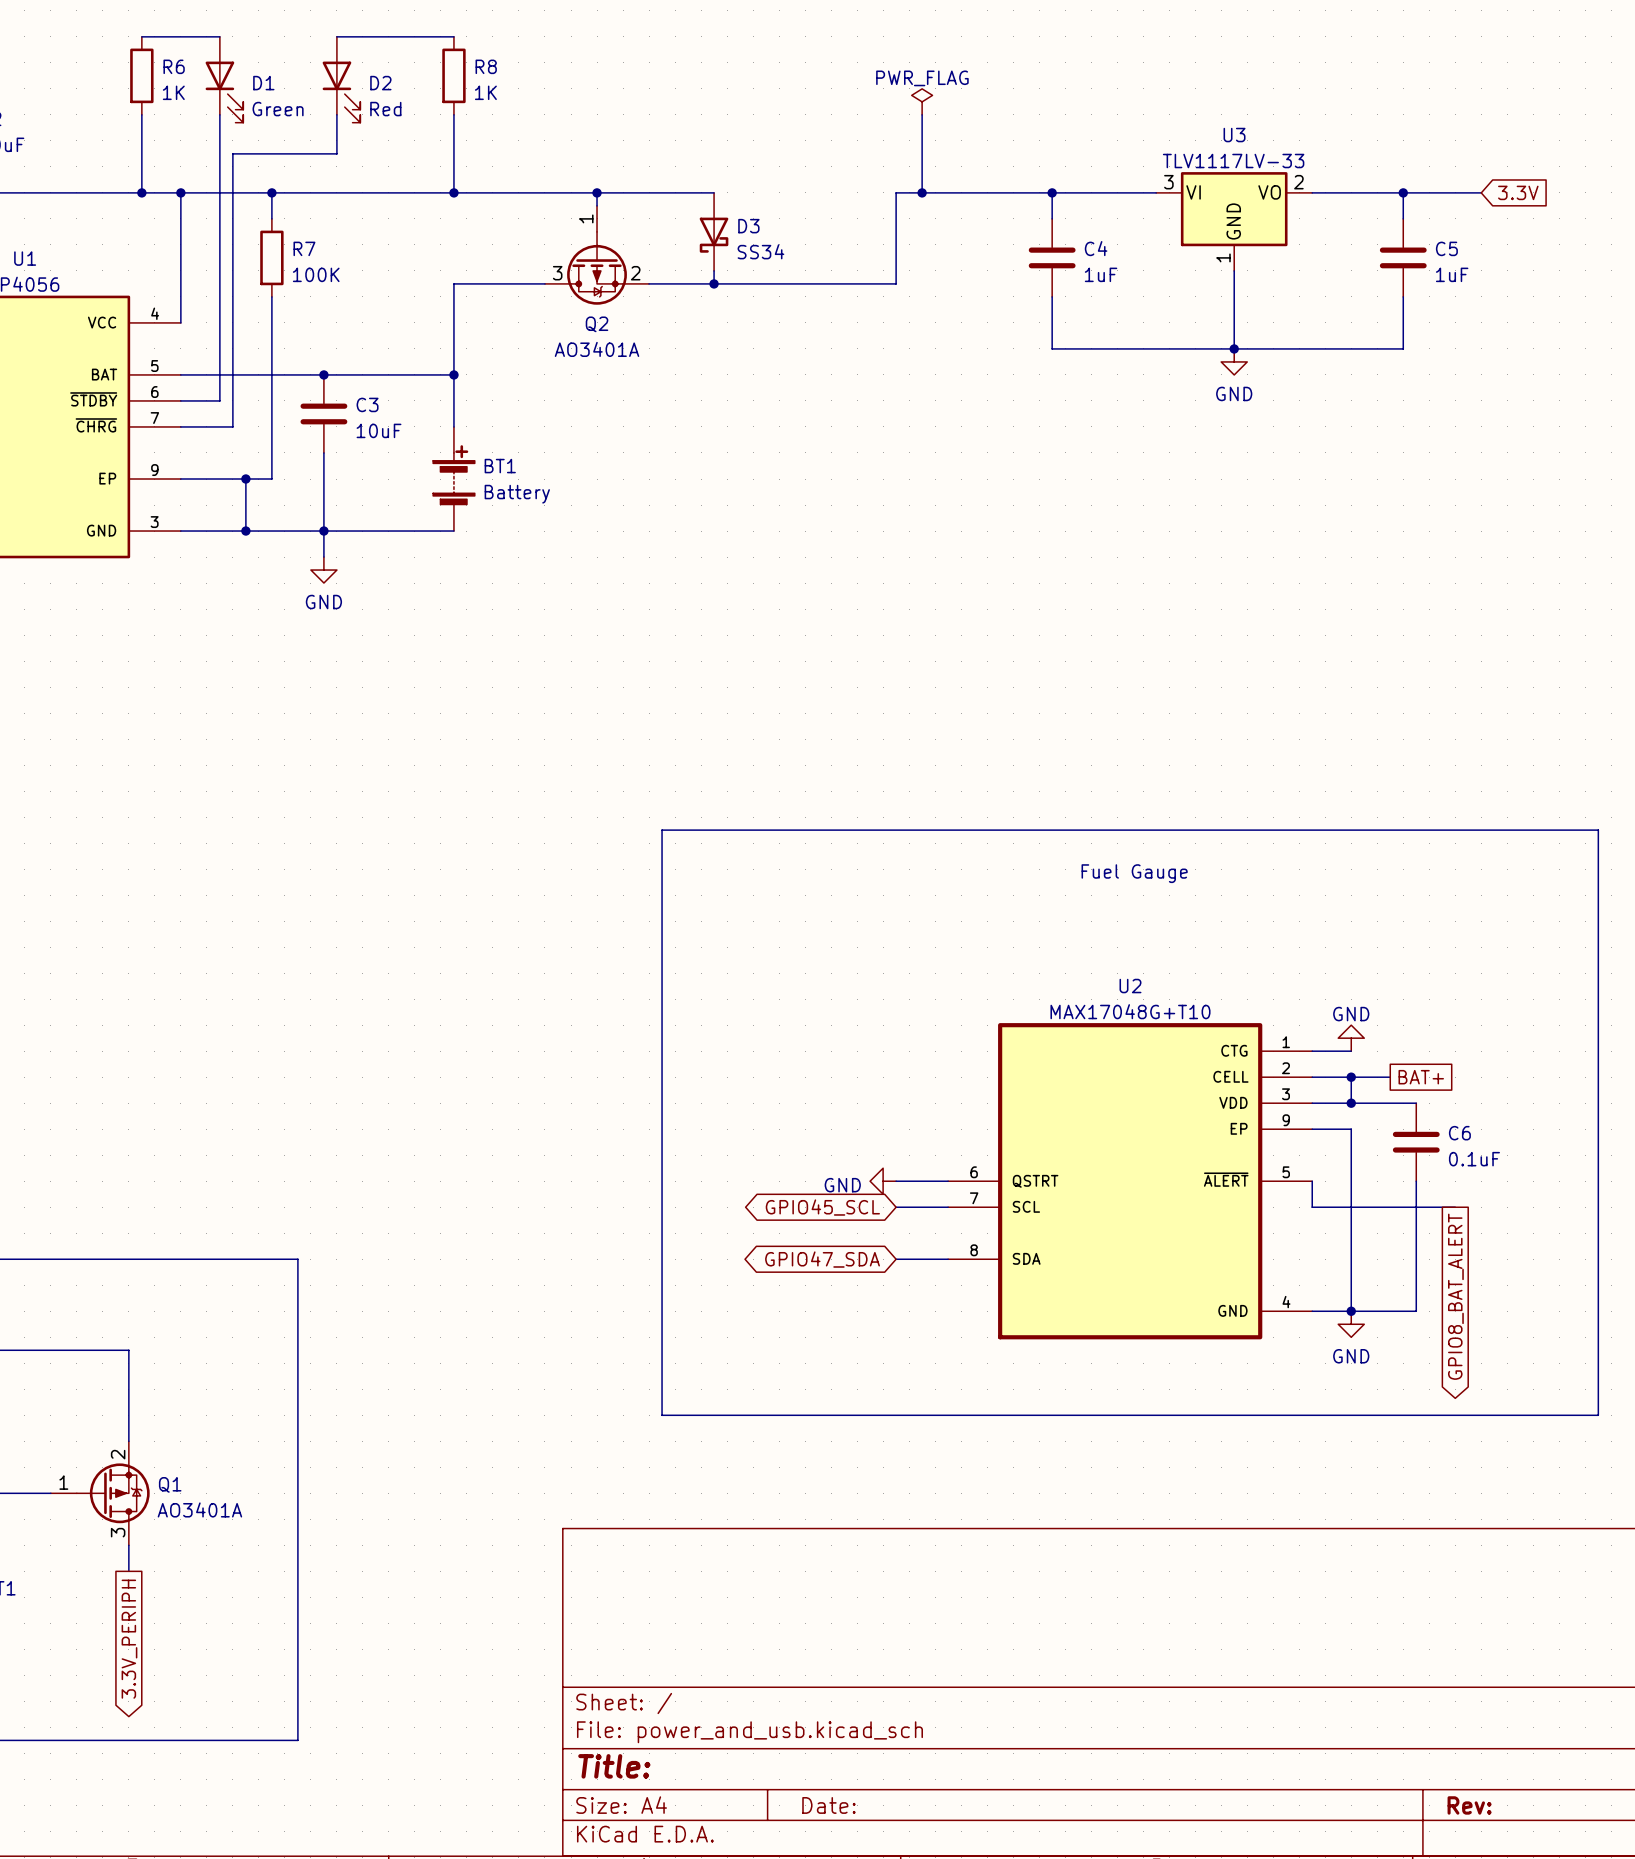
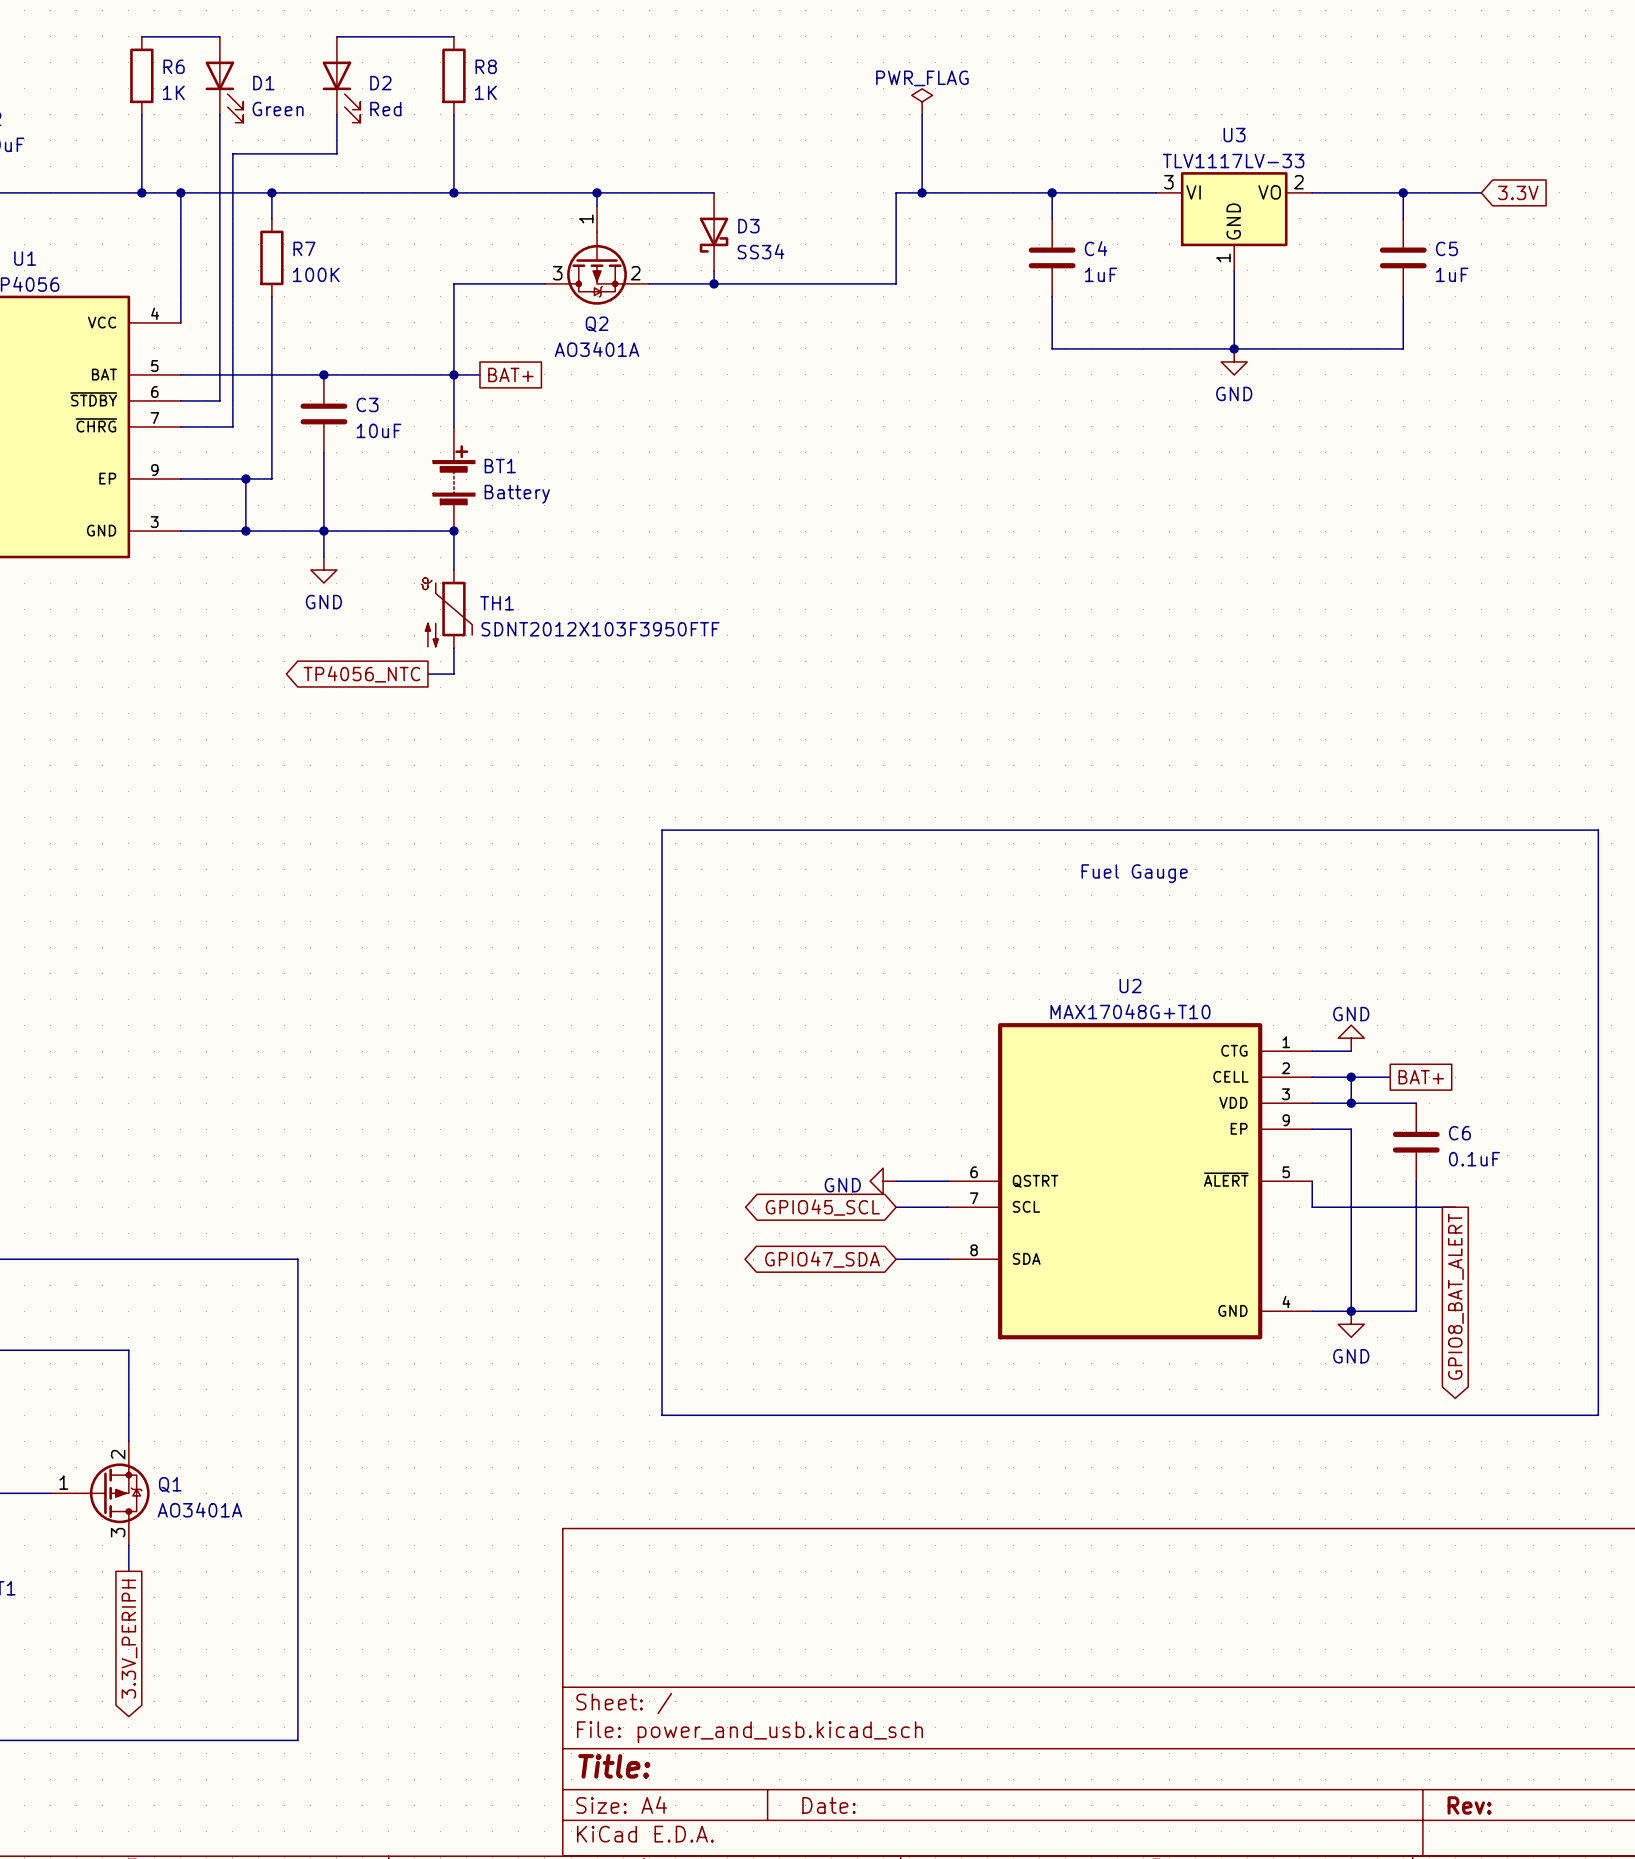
wire: none -> (453, 374) (479, 374)
global label: none -> BAT+ (510, 374)
wire: none -> (453, 531) (453, 570)
junction: none -> (453, 531)
TH1: none -> SDNT2012X103F3950FTF (446, 609)
wire: none -> (453, 648) (453, 674) (427, 674)
global label: none -> TP4056_NTC (361, 674)

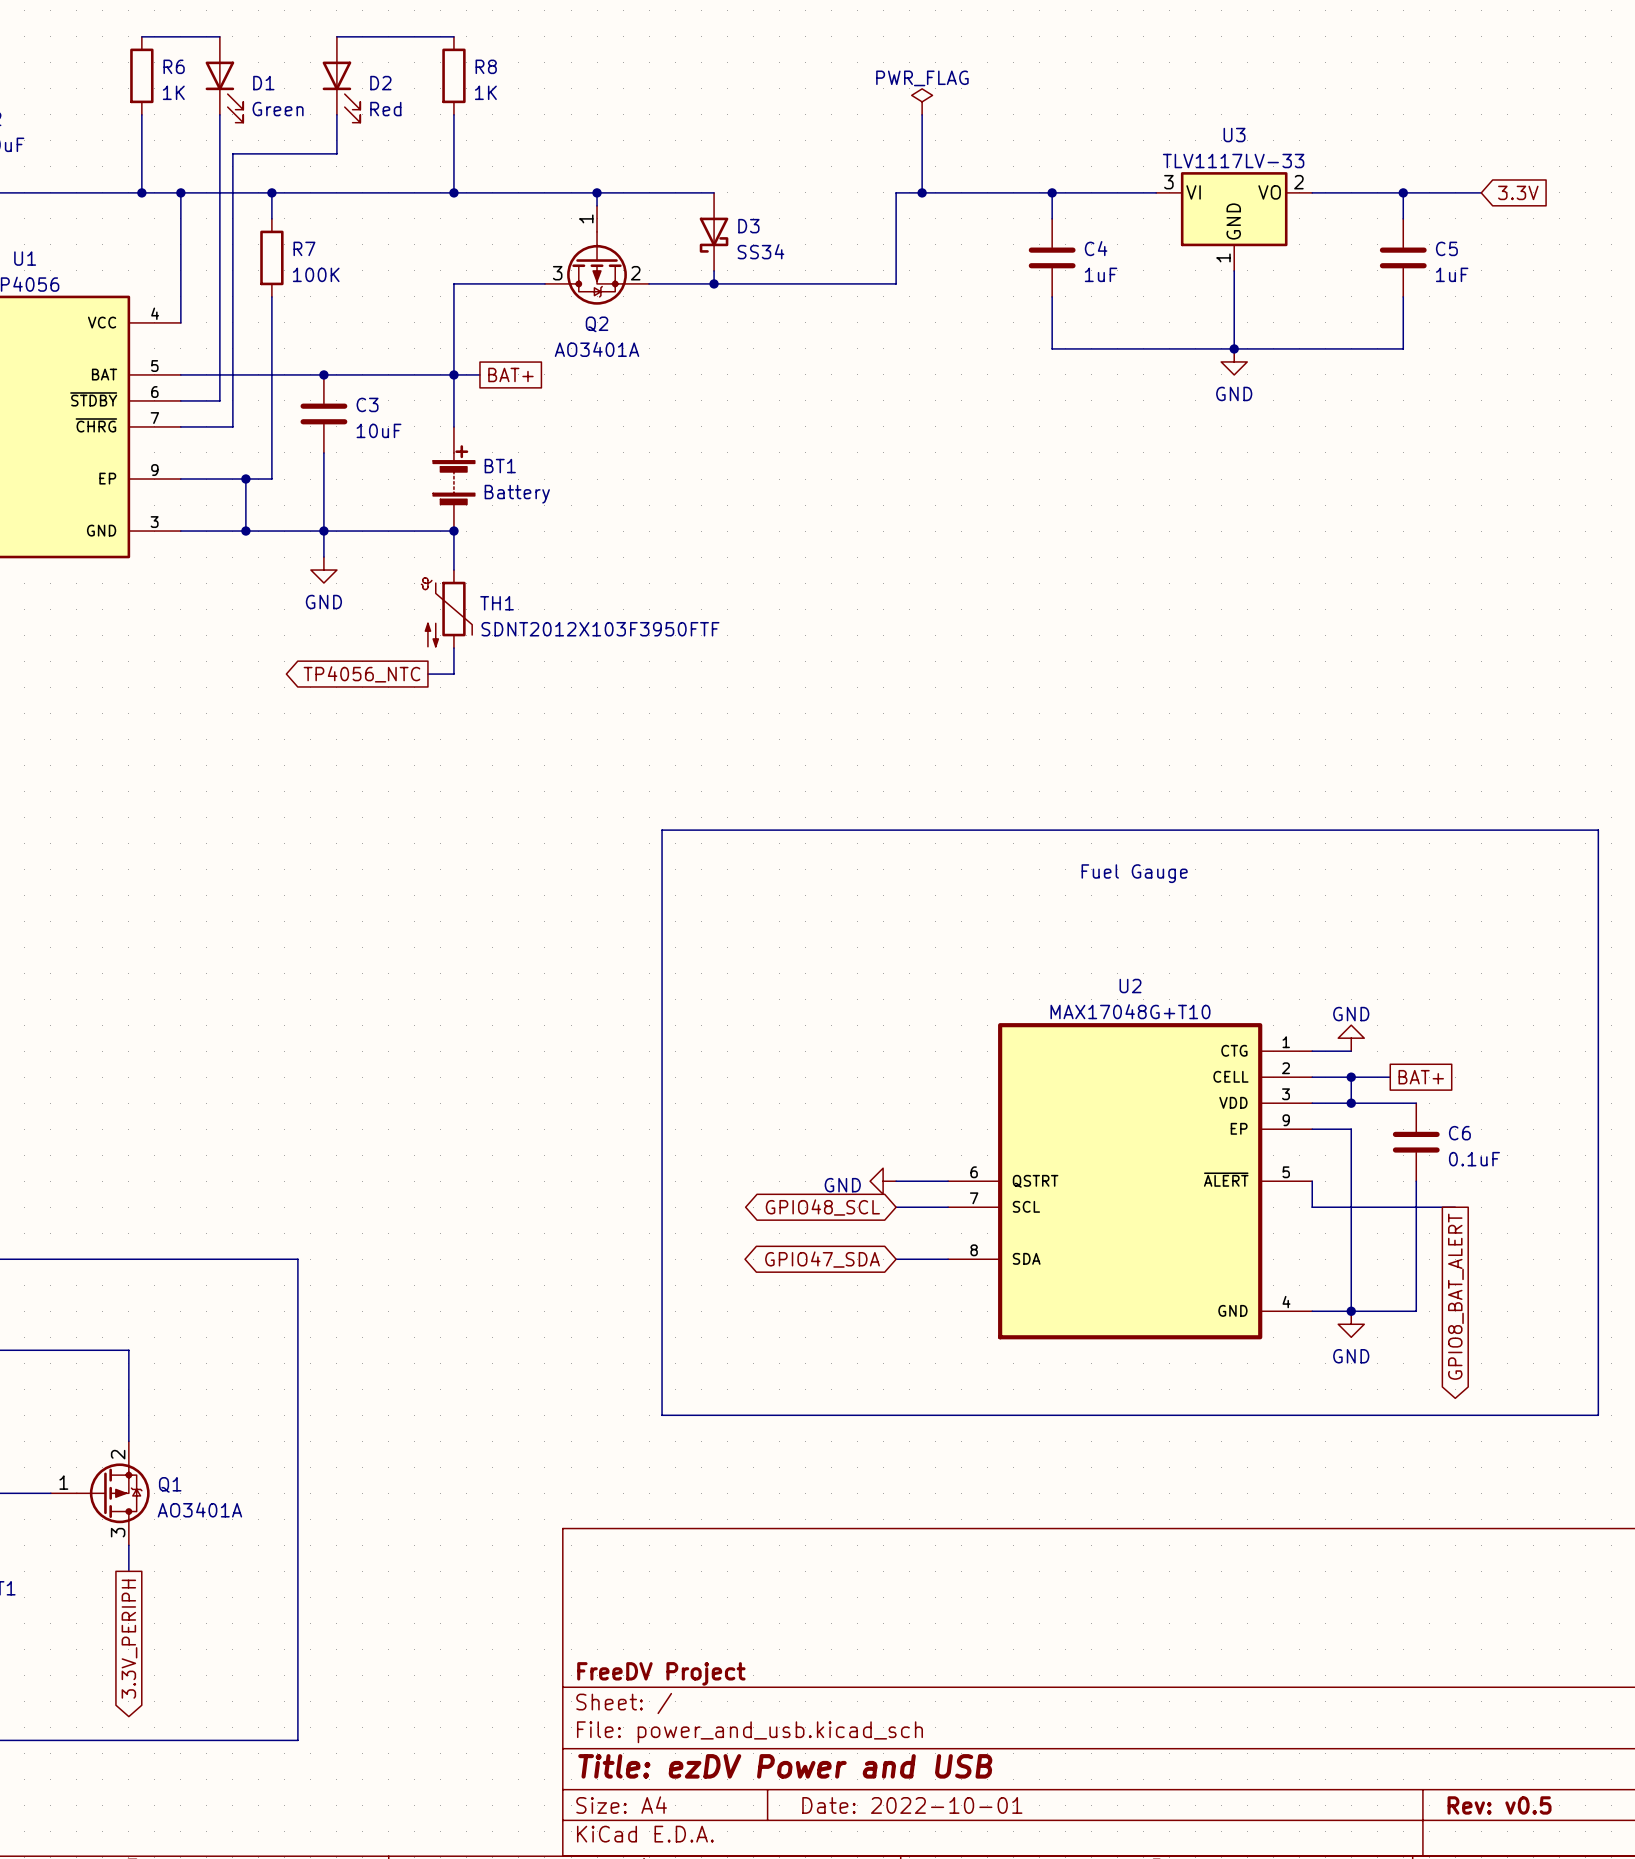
global label: GPIO45_SCL (822, 1207) -> GPIO48_SCL (822, 1207)
title block: none -> FreeDV Project (661, 1673)
title block: Title: (614, 1766) -> Title: ezDV Power and USB (785, 1766)
title block: Date: (828, 1805) -> Date: 2022-10-01 (912, 1805)
title block: Rev: (1469, 1805) -> Rev: v0.5 (1499, 1805)

